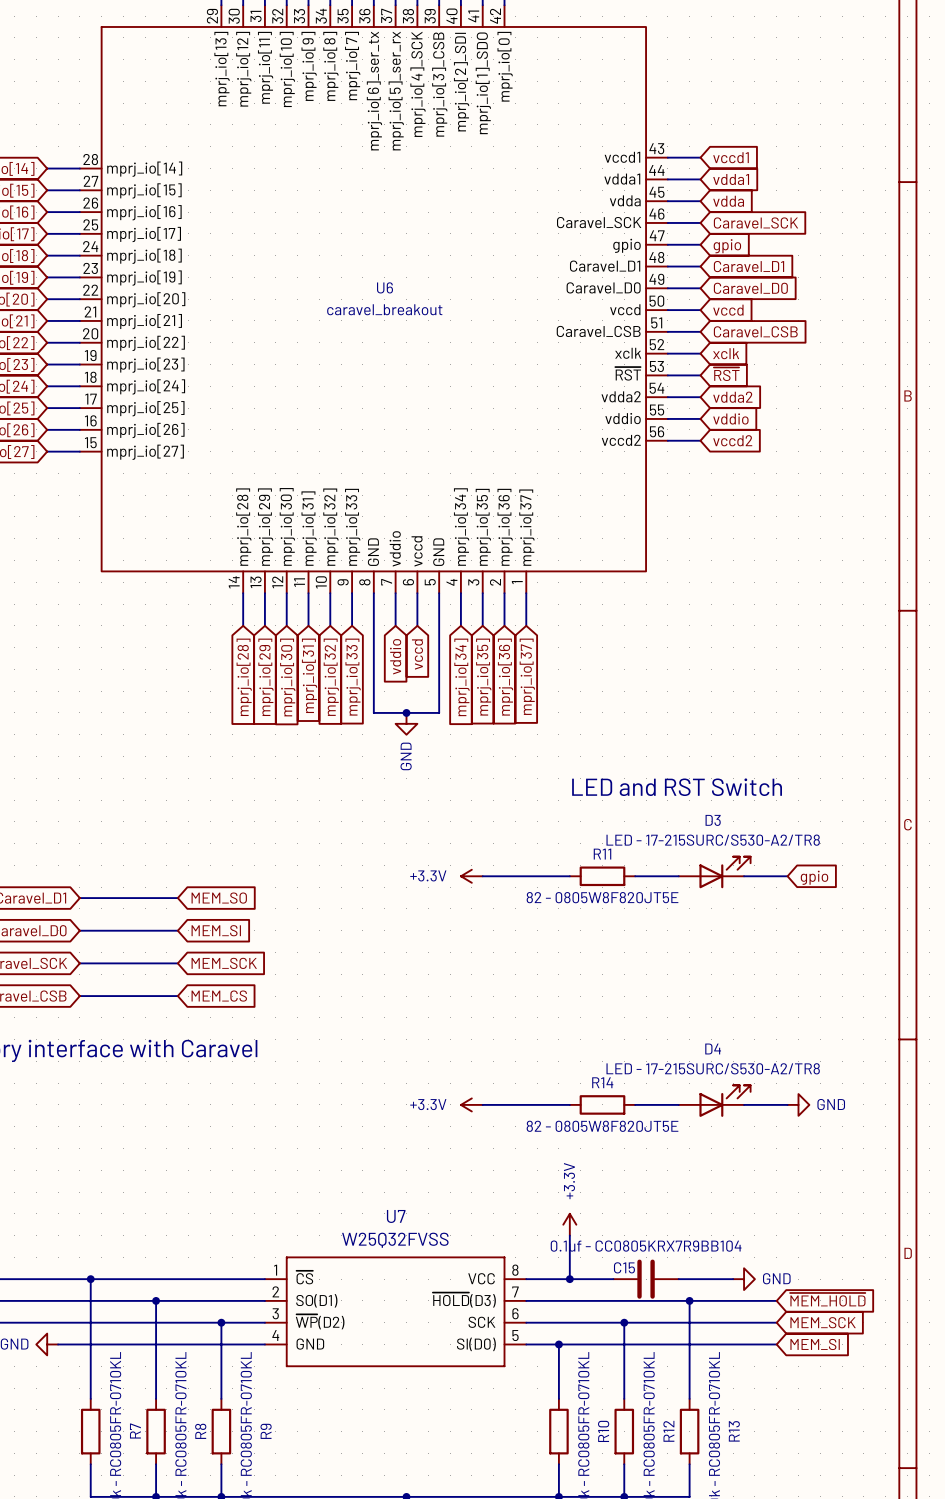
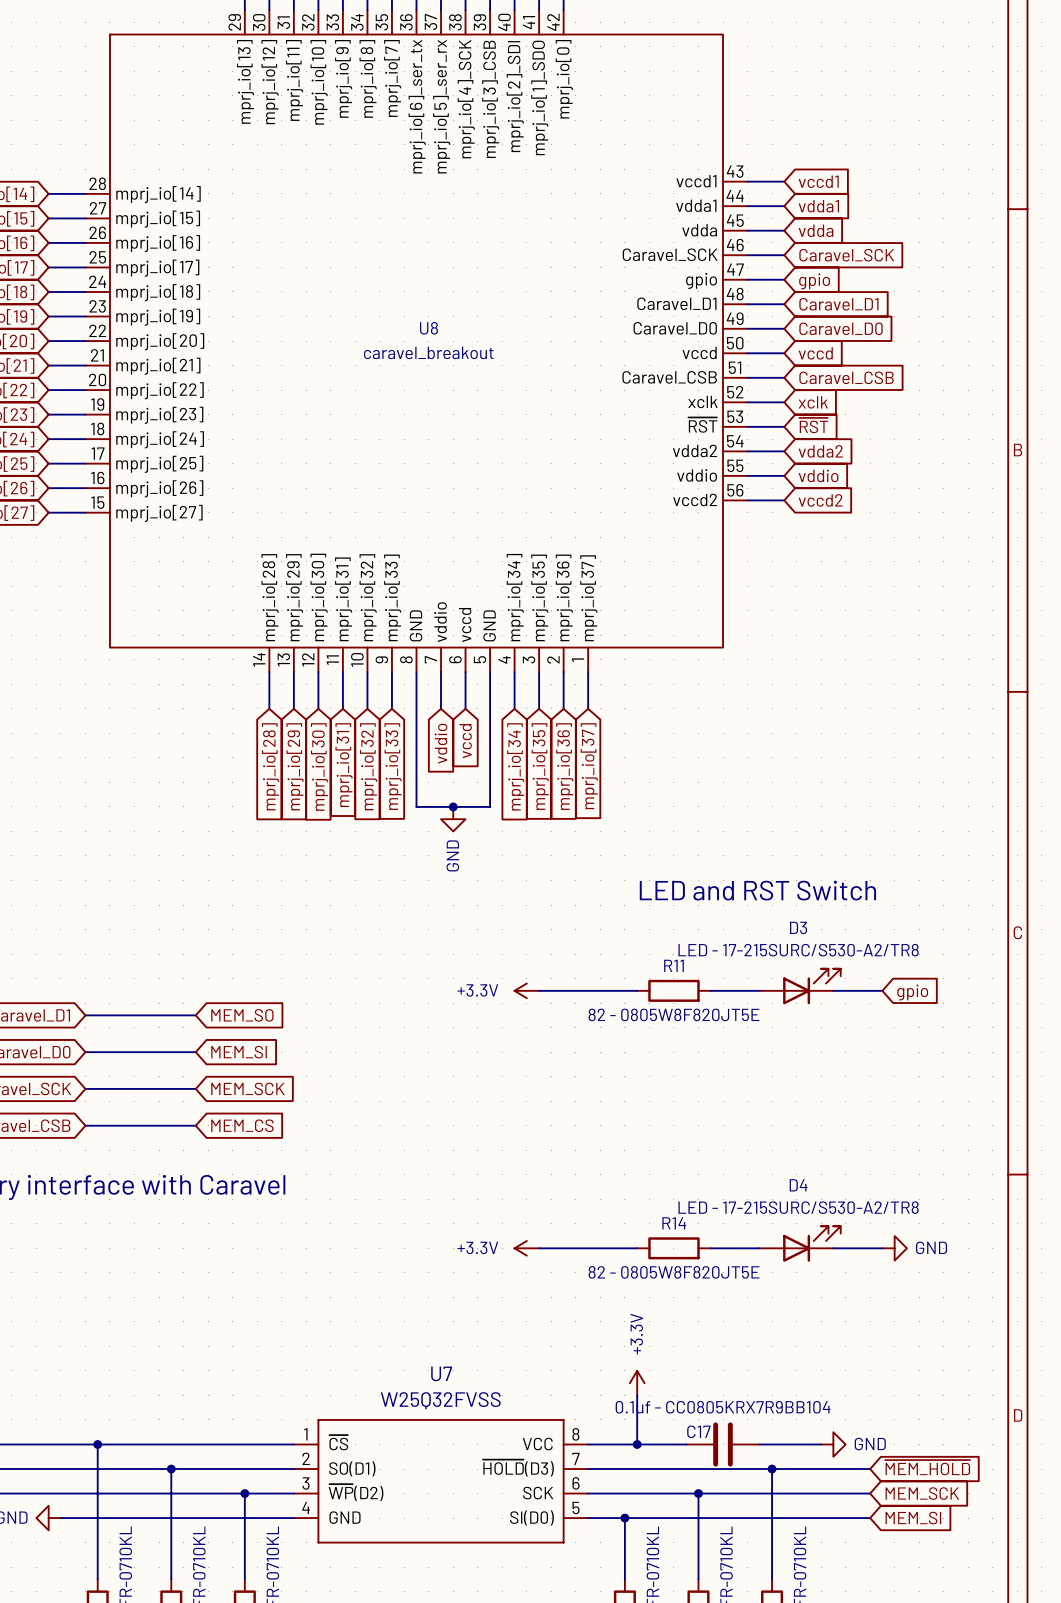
U6 name: U6 (385, 287) -> U8 (428, 328)
C15 name: C15 (624, 1267) -> C17 (698, 1431)

